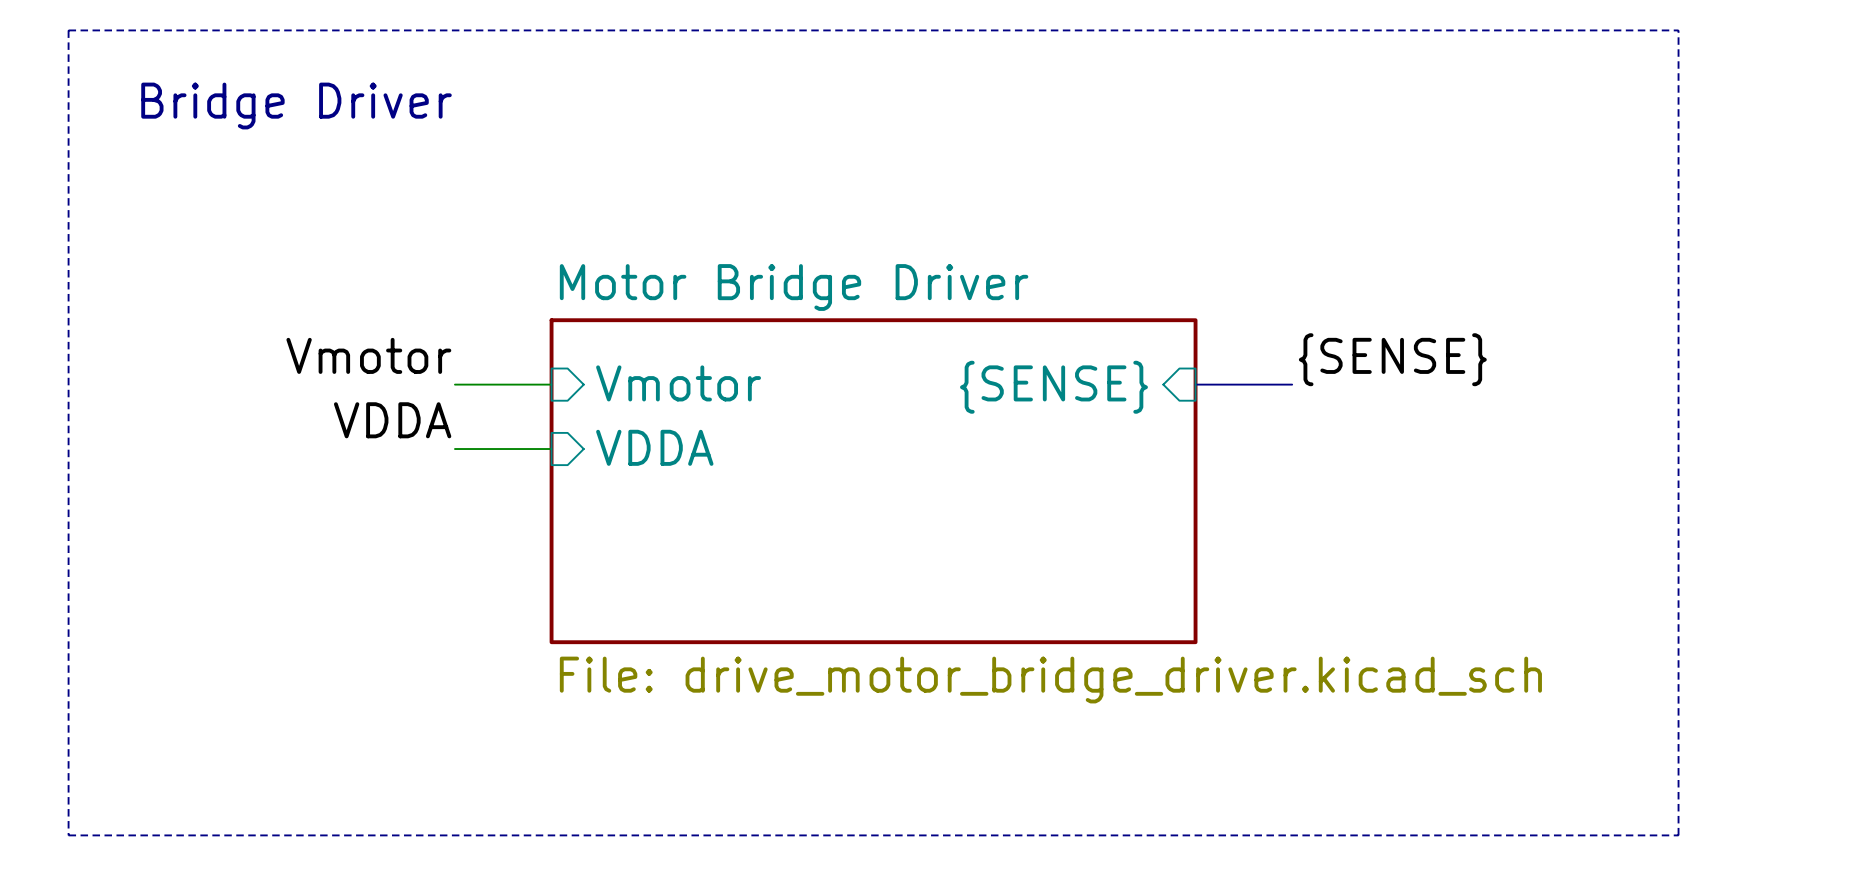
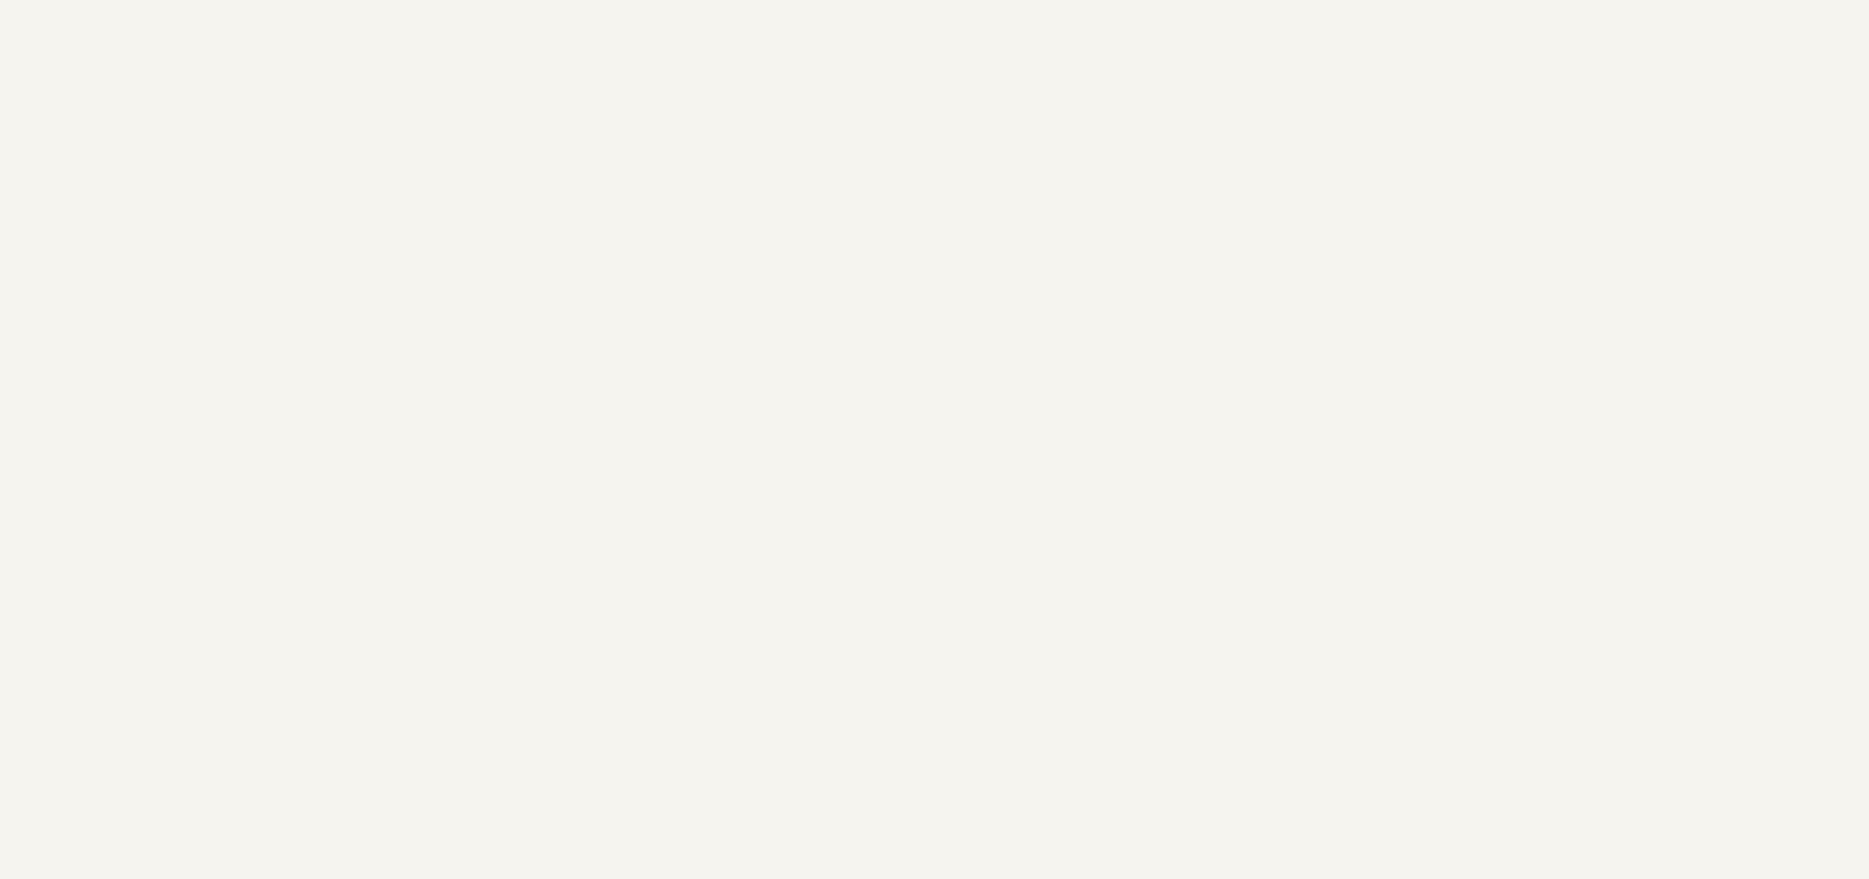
line: (68, 30) (68, 835) (1678, 835) (1678, 30) (68, 30) -> none
text: Bridge Driver (296, 106) -> none
label: Vmotor (368, 355) -> none
label: {SENSE} (1392, 359) -> none
sheet pin: Vmotor (678, 383) -> none
wire: (454, 384) (551, 384) -> none
bus: (1195, 384) (1292, 384) -> none
sheet pin: {SENSE} (1053, 387) -> none
label: VDDA (392, 420) -> none
sheet pin: VDDA (654, 447) -> none
wire: (454, 449) (551, 449) -> none
sheet Motor Bridge Driver: File: drive_motor_bridge_driver.kicad_sch (873, 481) -> none

